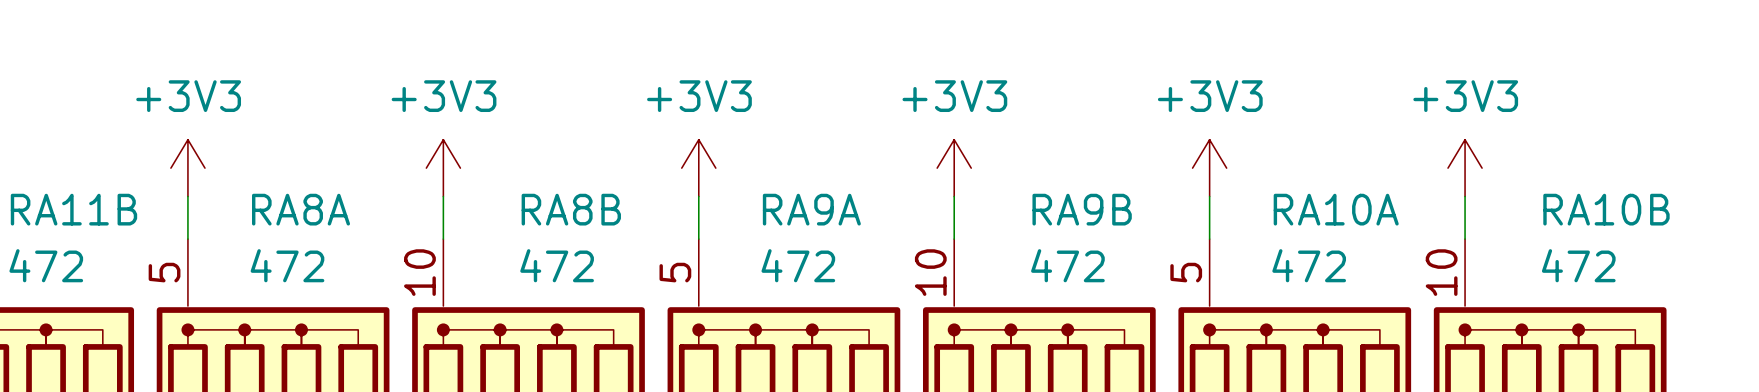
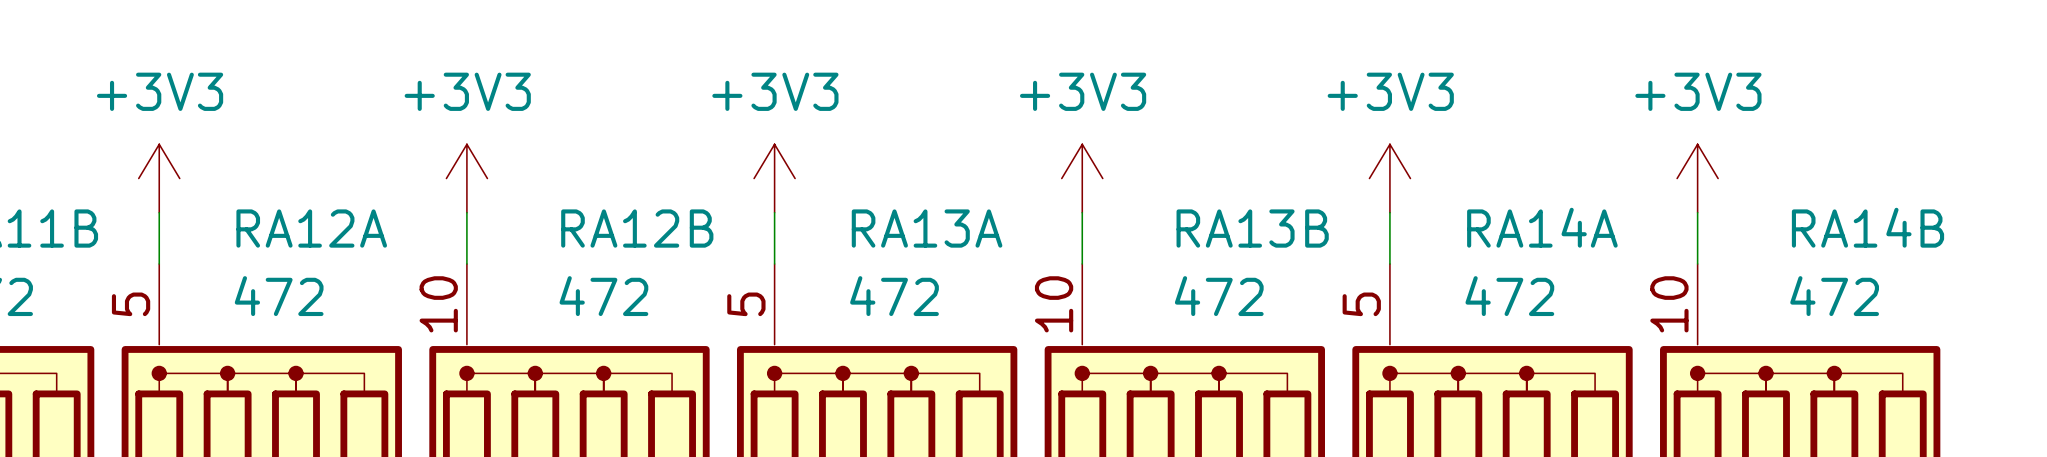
RA8A name: RA8A (301, 209) -> RA12A (311, 228)
RA8B name: RA8B (571, 209) -> RA12B (637, 228)
RA9A name: RA9A (811, 209) -> RA13A (927, 228)
RA9B name: RA9B (1082, 209) -> RA13B (1252, 228)
RA10A name: RA10A (1336, 209) -> RA14A (1542, 227)
RA10B name: RA10B (1606, 209) -> RA14B (1867, 227)

